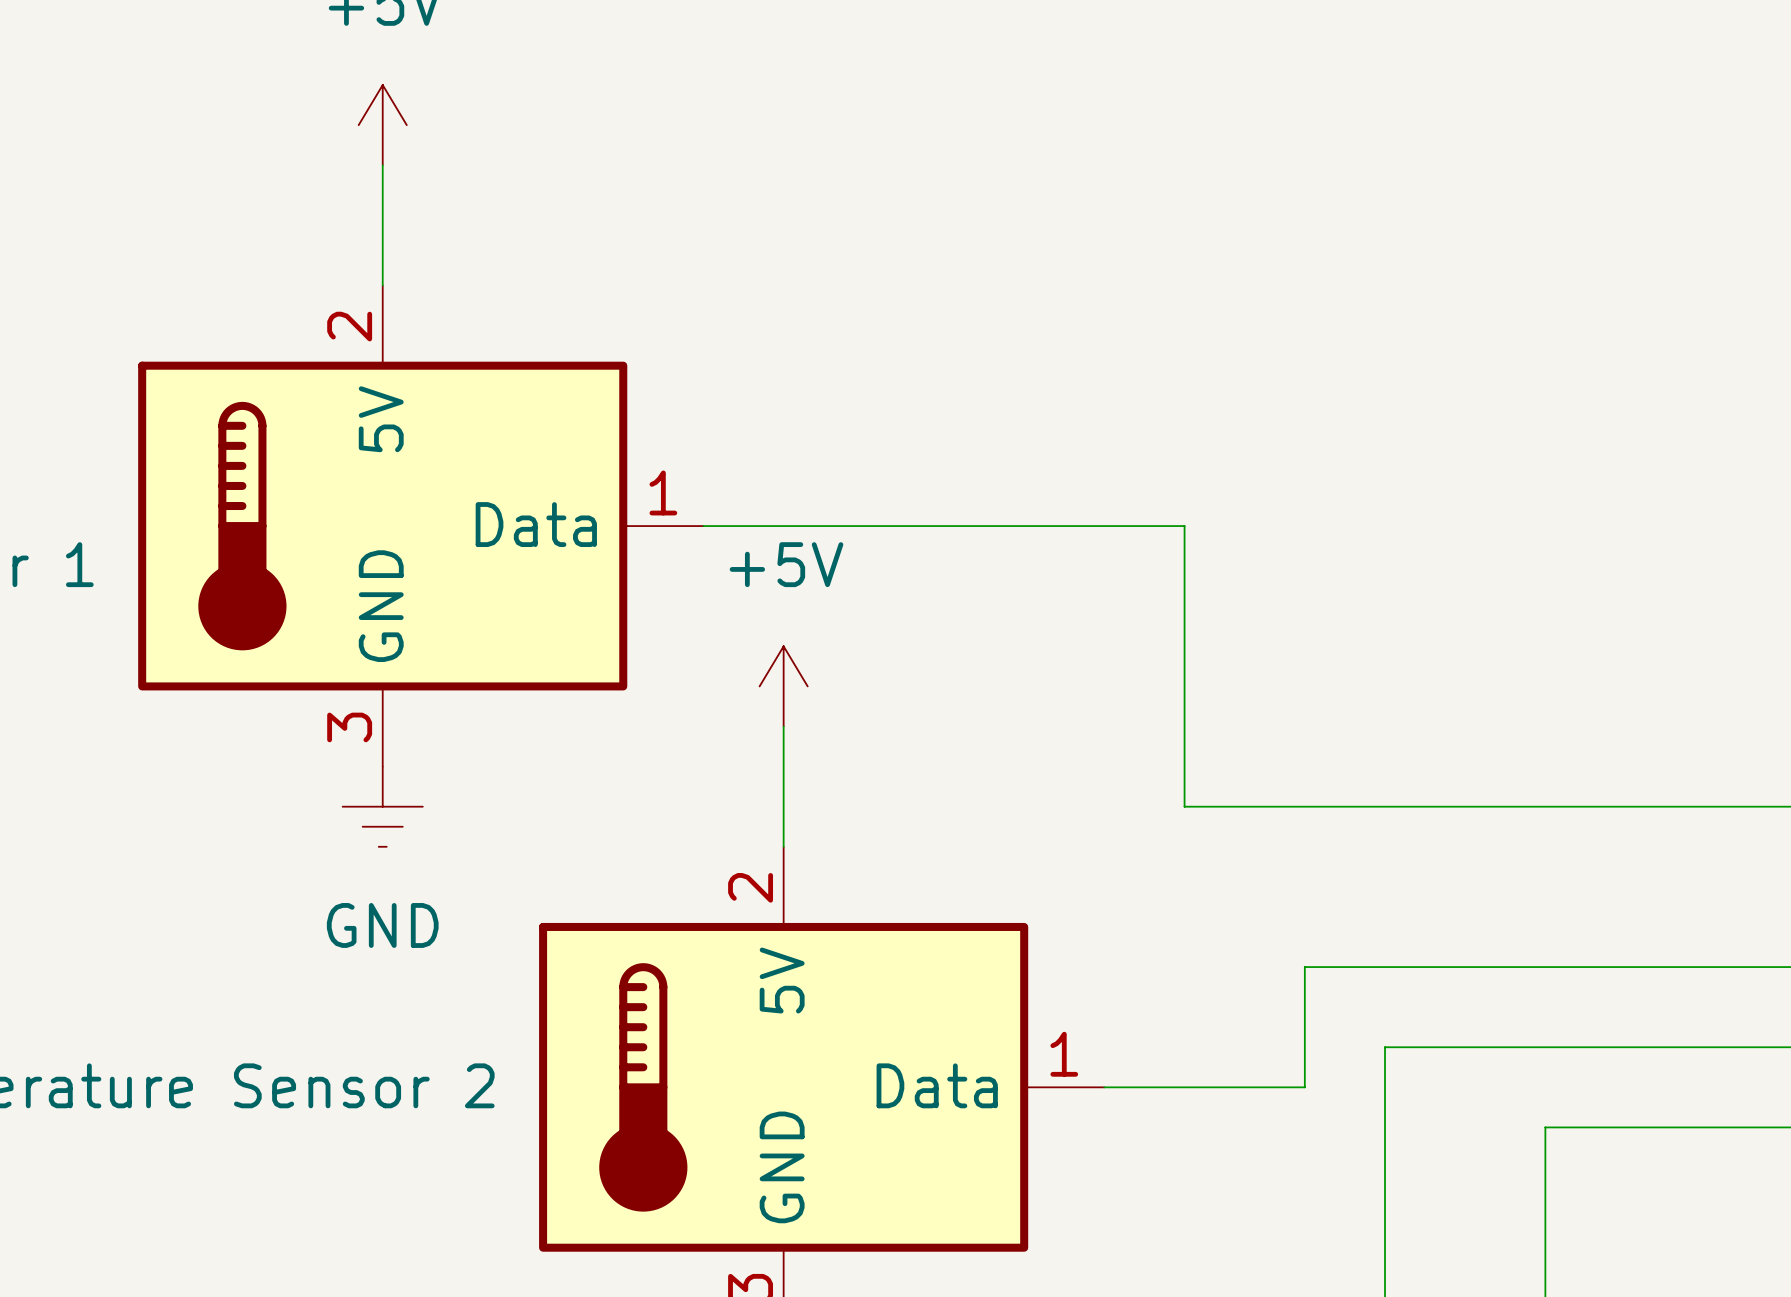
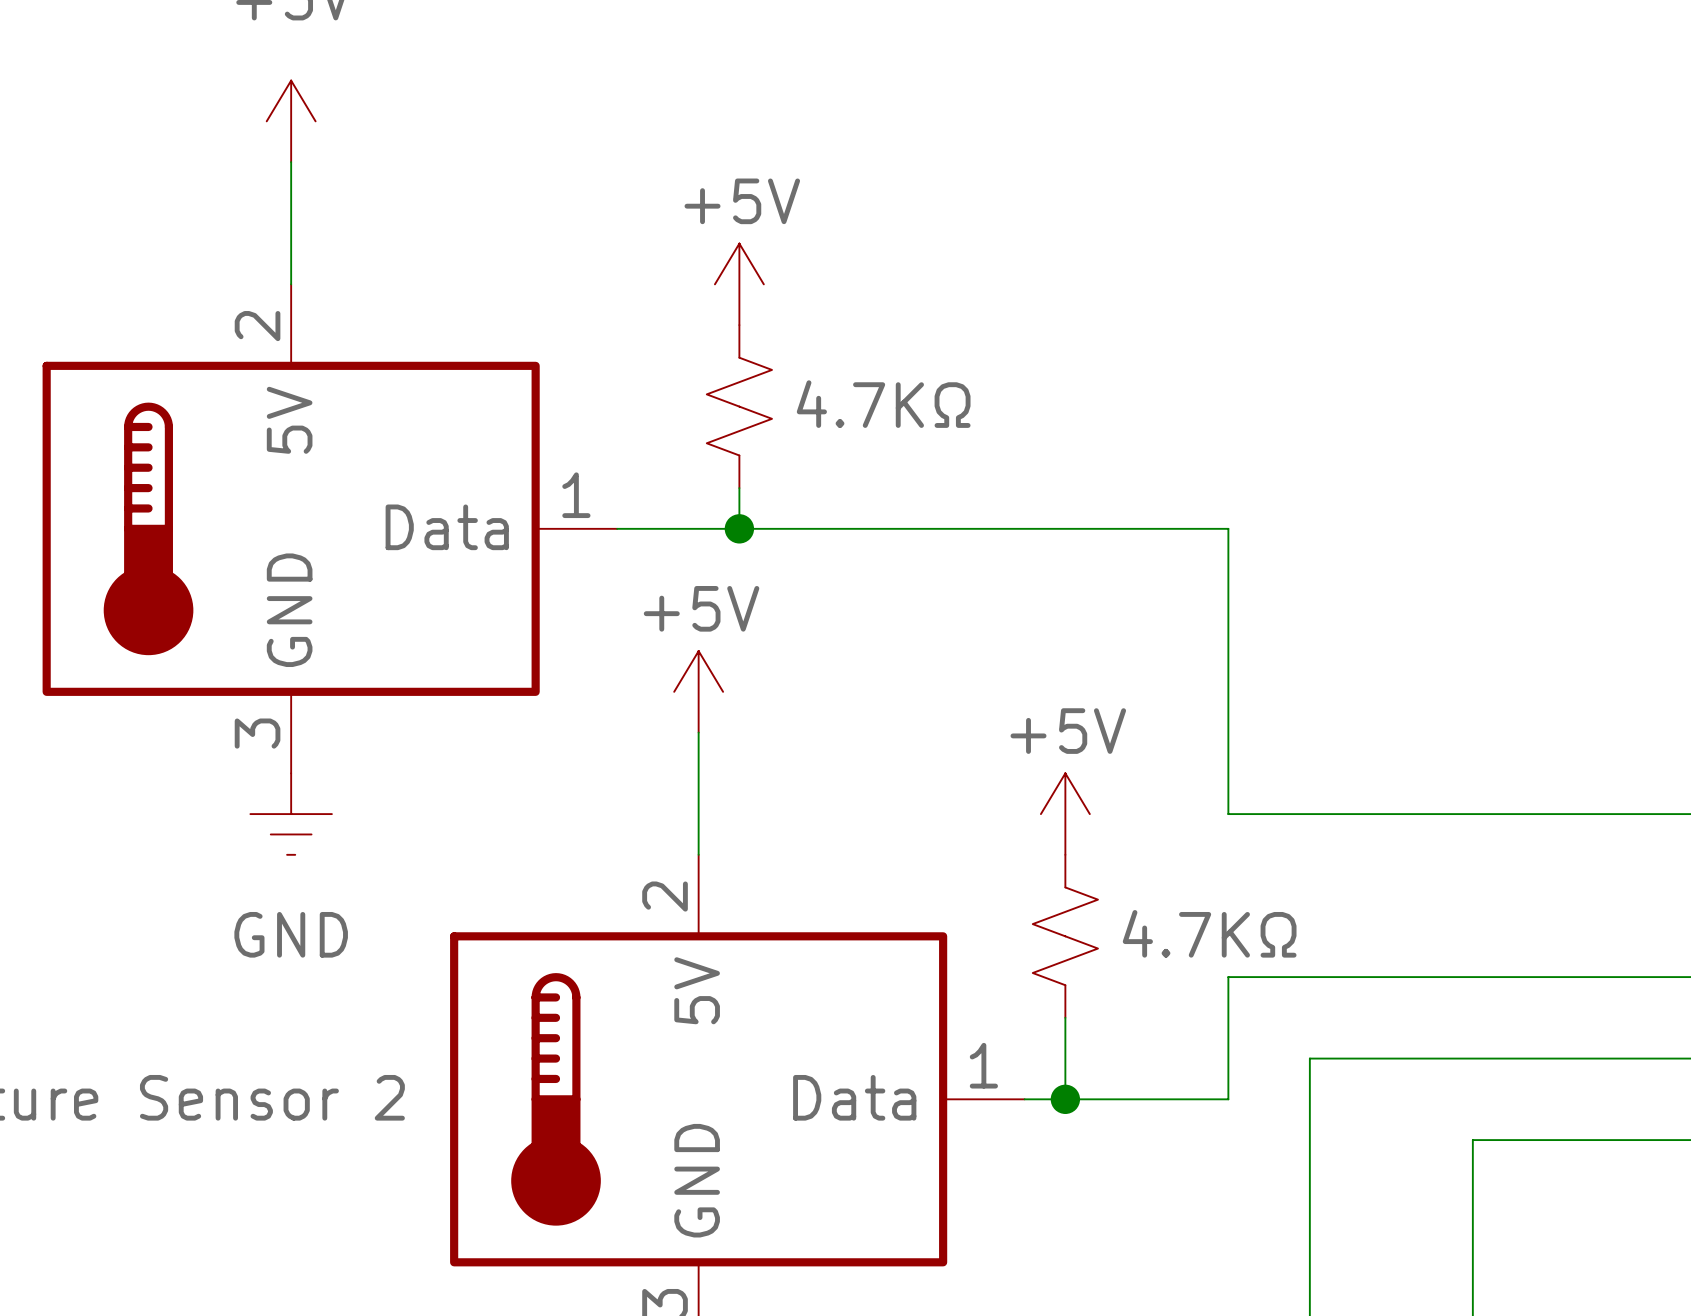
power symbol: none -> +5V (739, 284)
part: none -> 4.7KΩ (739, 406)
wire: none -> (739, 488) (739, 528)
junction: none -> (739, 528)
wire: (1184, 526) (1184, 806) (1304, 806) -> (1106, 528) (1228, 528) (1228, 814)
power symbol text position: +5V (786, 564) -> +5V (701, 608)
power symbol: none -> +5V (1065, 814)
part: none -> 4.7KΩ (1065, 936)
wire: none -> (1065, 1017) (1065, 1099)
junction: none -> (1065, 1099)

